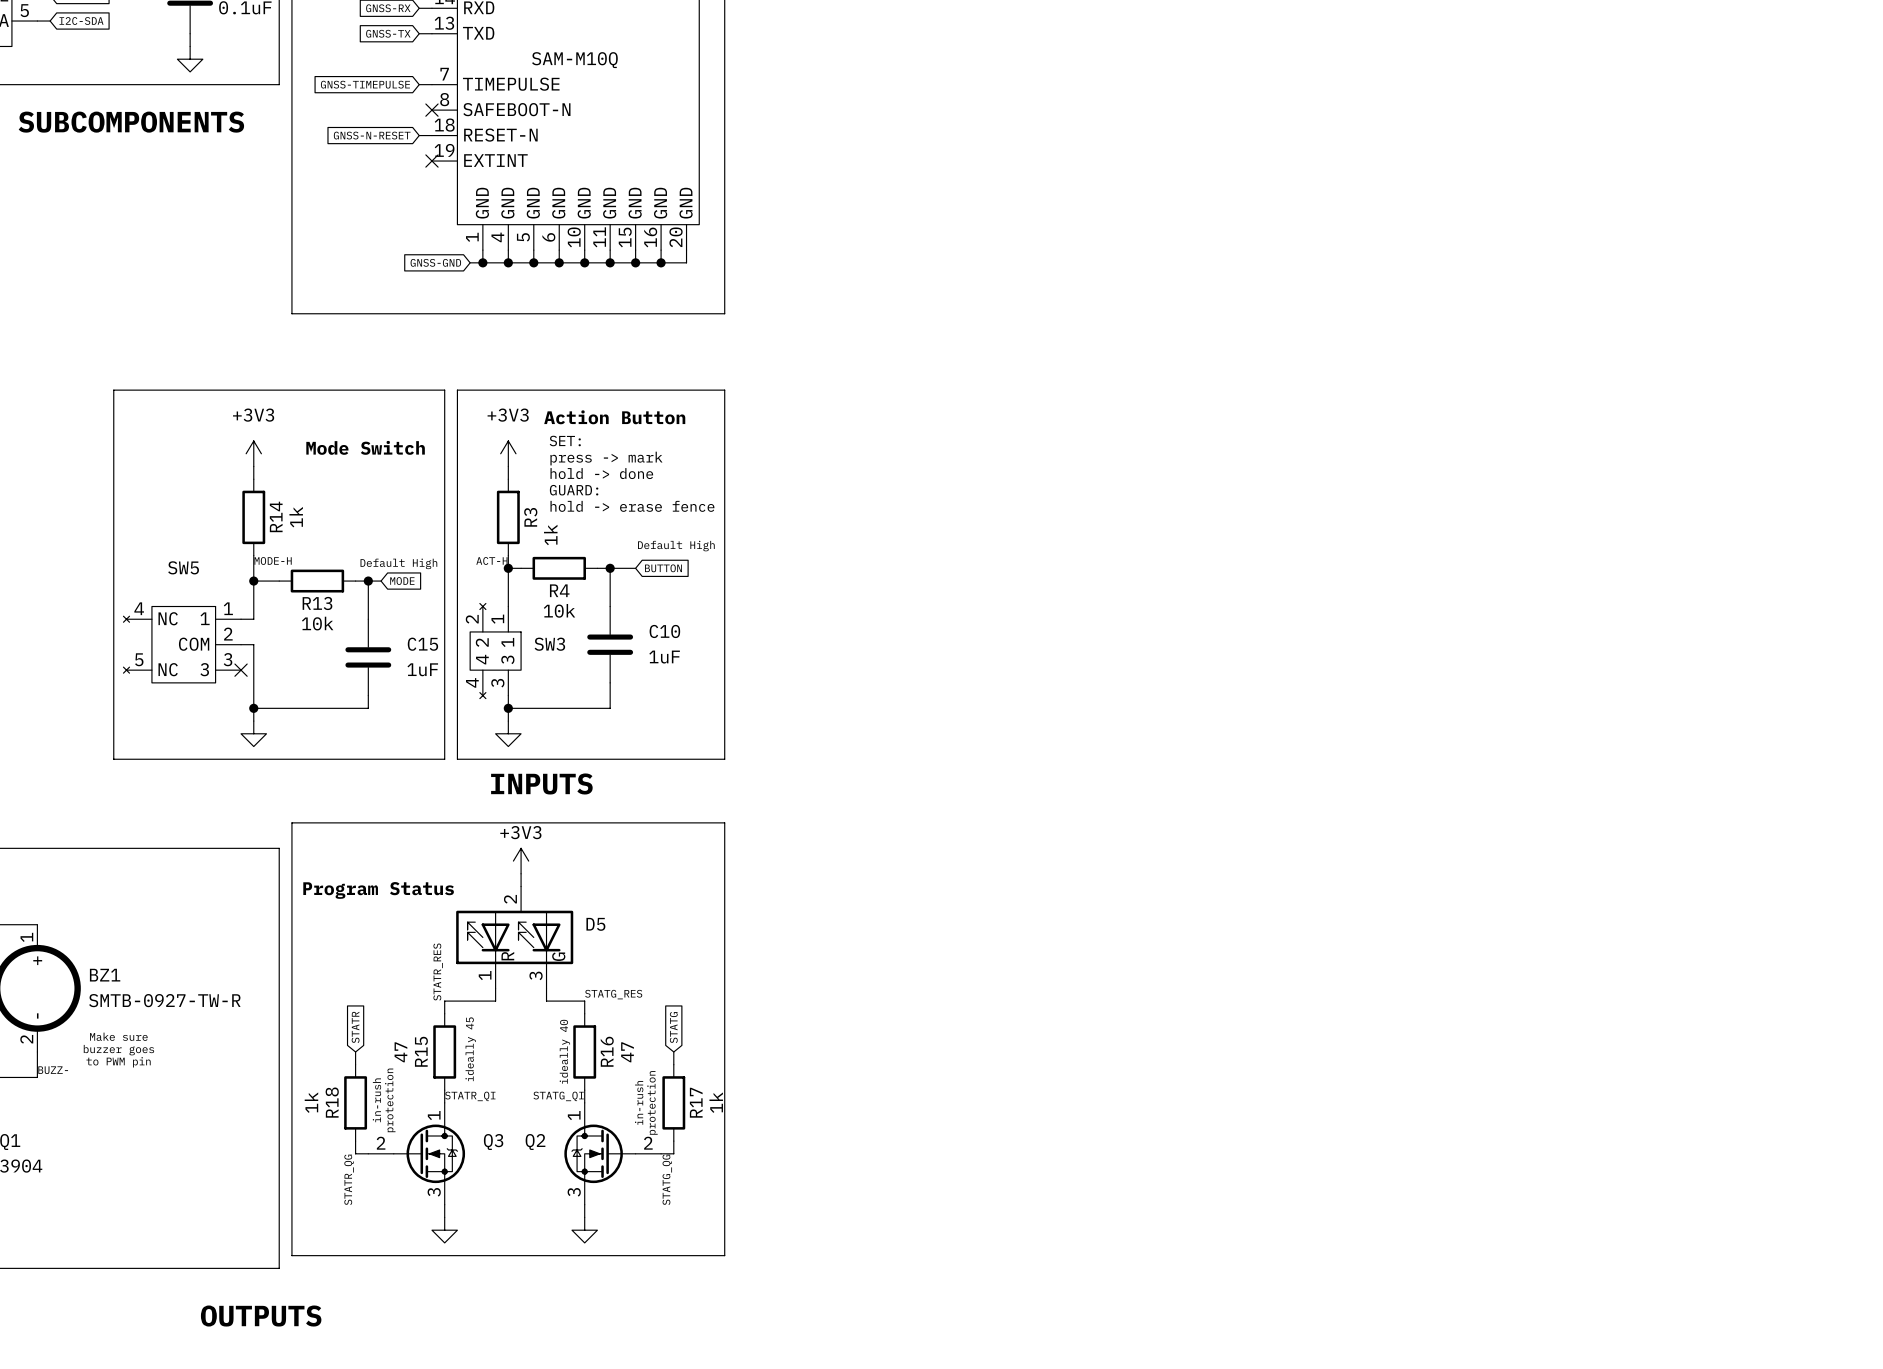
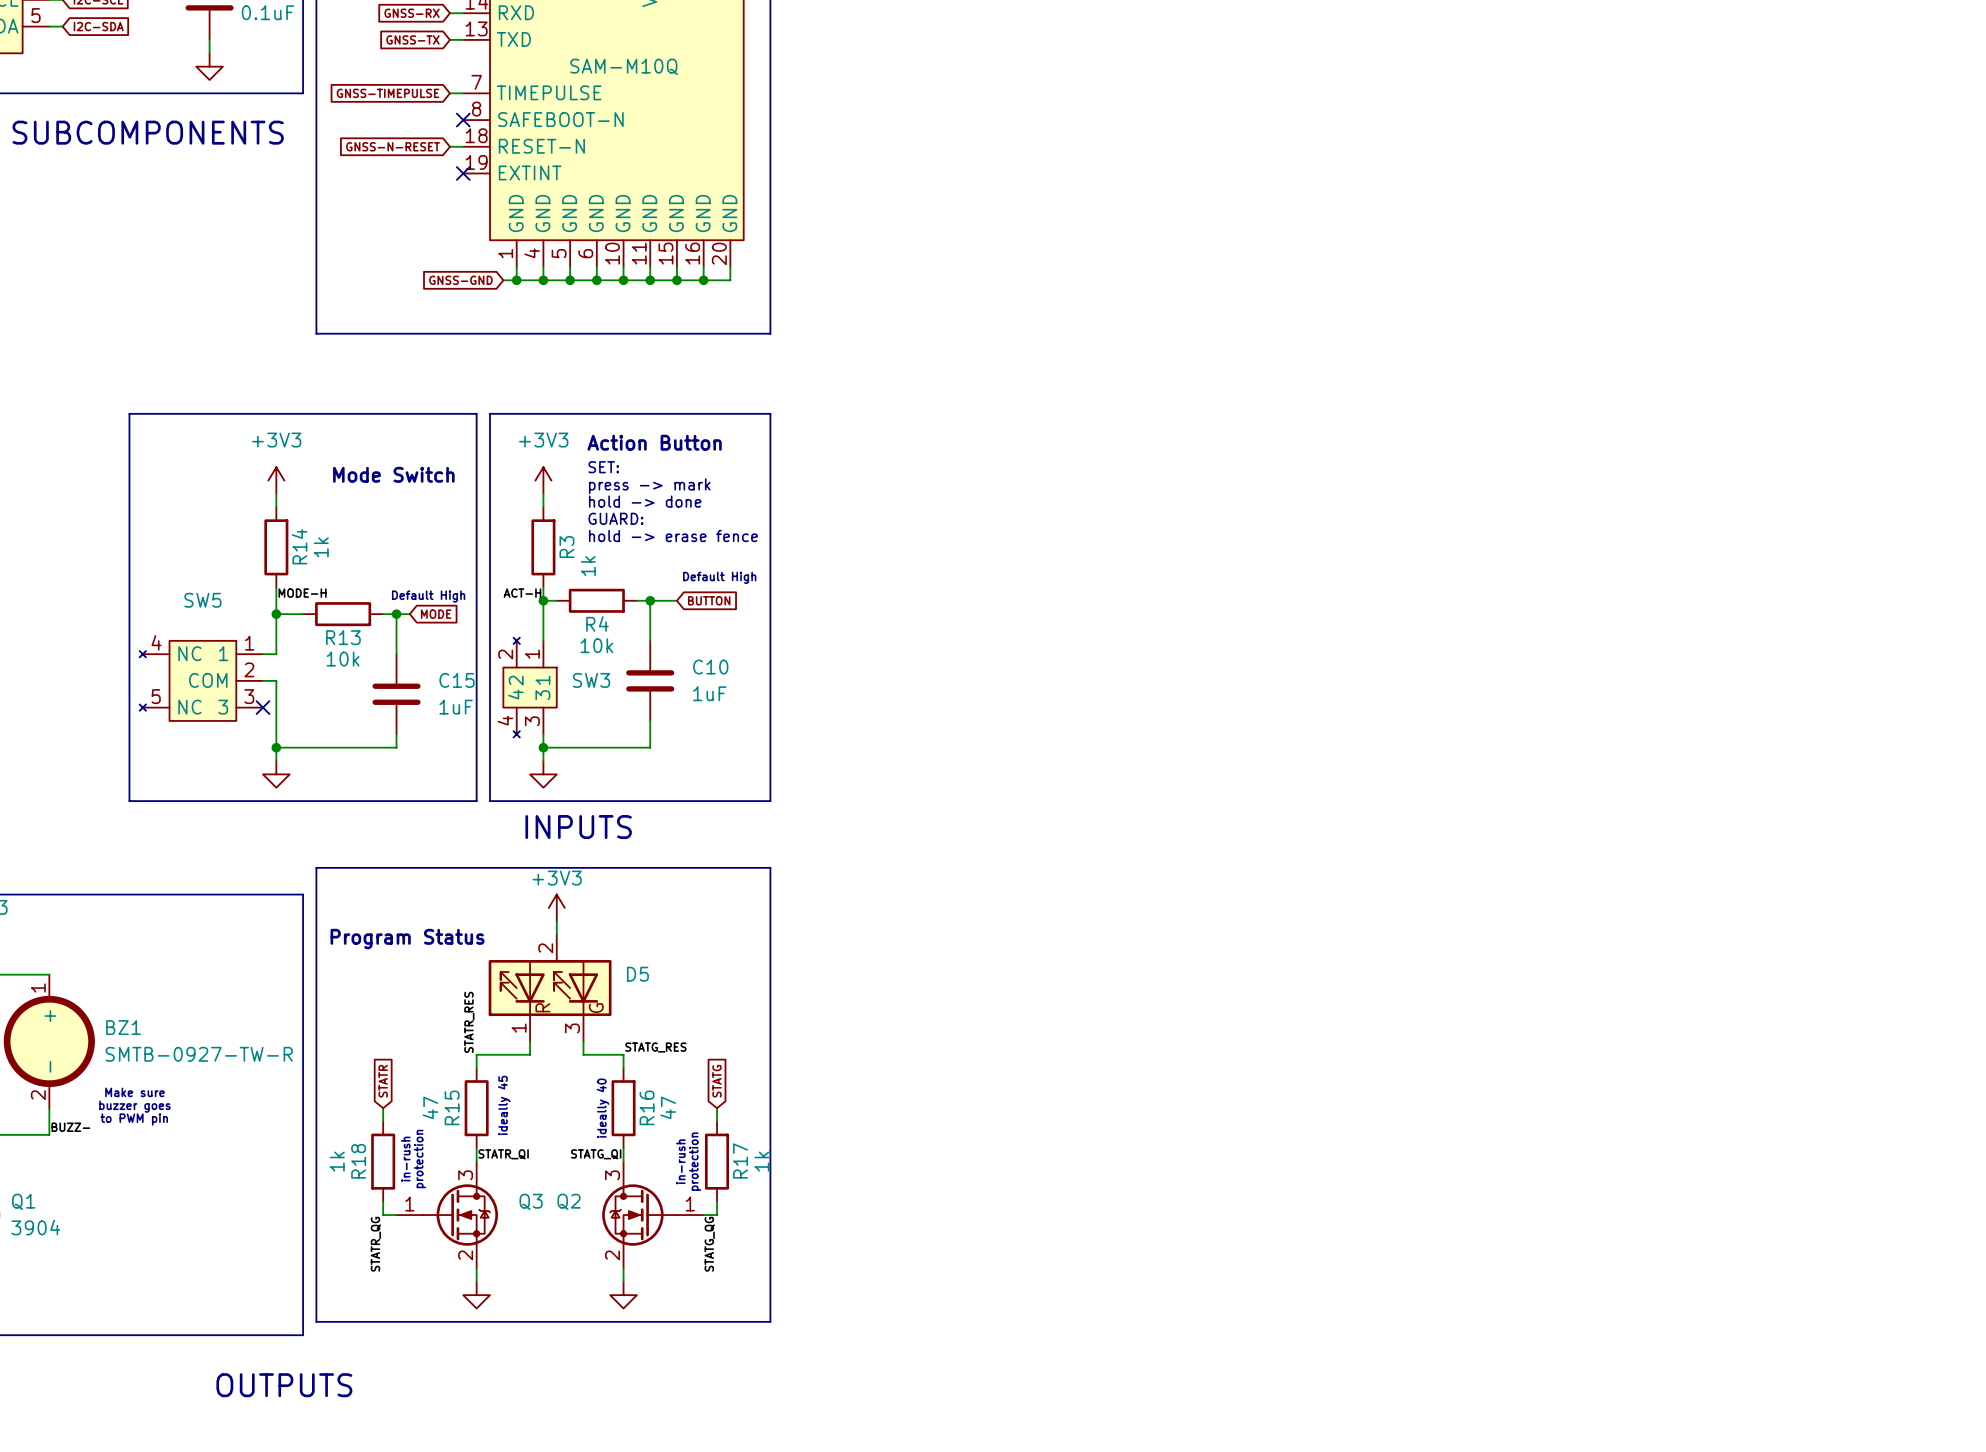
Q3 pin number: 1 (434, 1115) -> 3 (465, 1175)
Q2 pin number: 1 (574, 1115) -> 3 (612, 1175)
Q3 pin number: 2 (381, 1143) -> 1 (409, 1204)
Q2 pin number: 2 (648, 1143) -> 1 (690, 1204)
Q3 pin number: 3 (434, 1192) -> 2 (465, 1255)
Q2 pin number: 3 (574, 1192) -> 2 (612, 1255)

